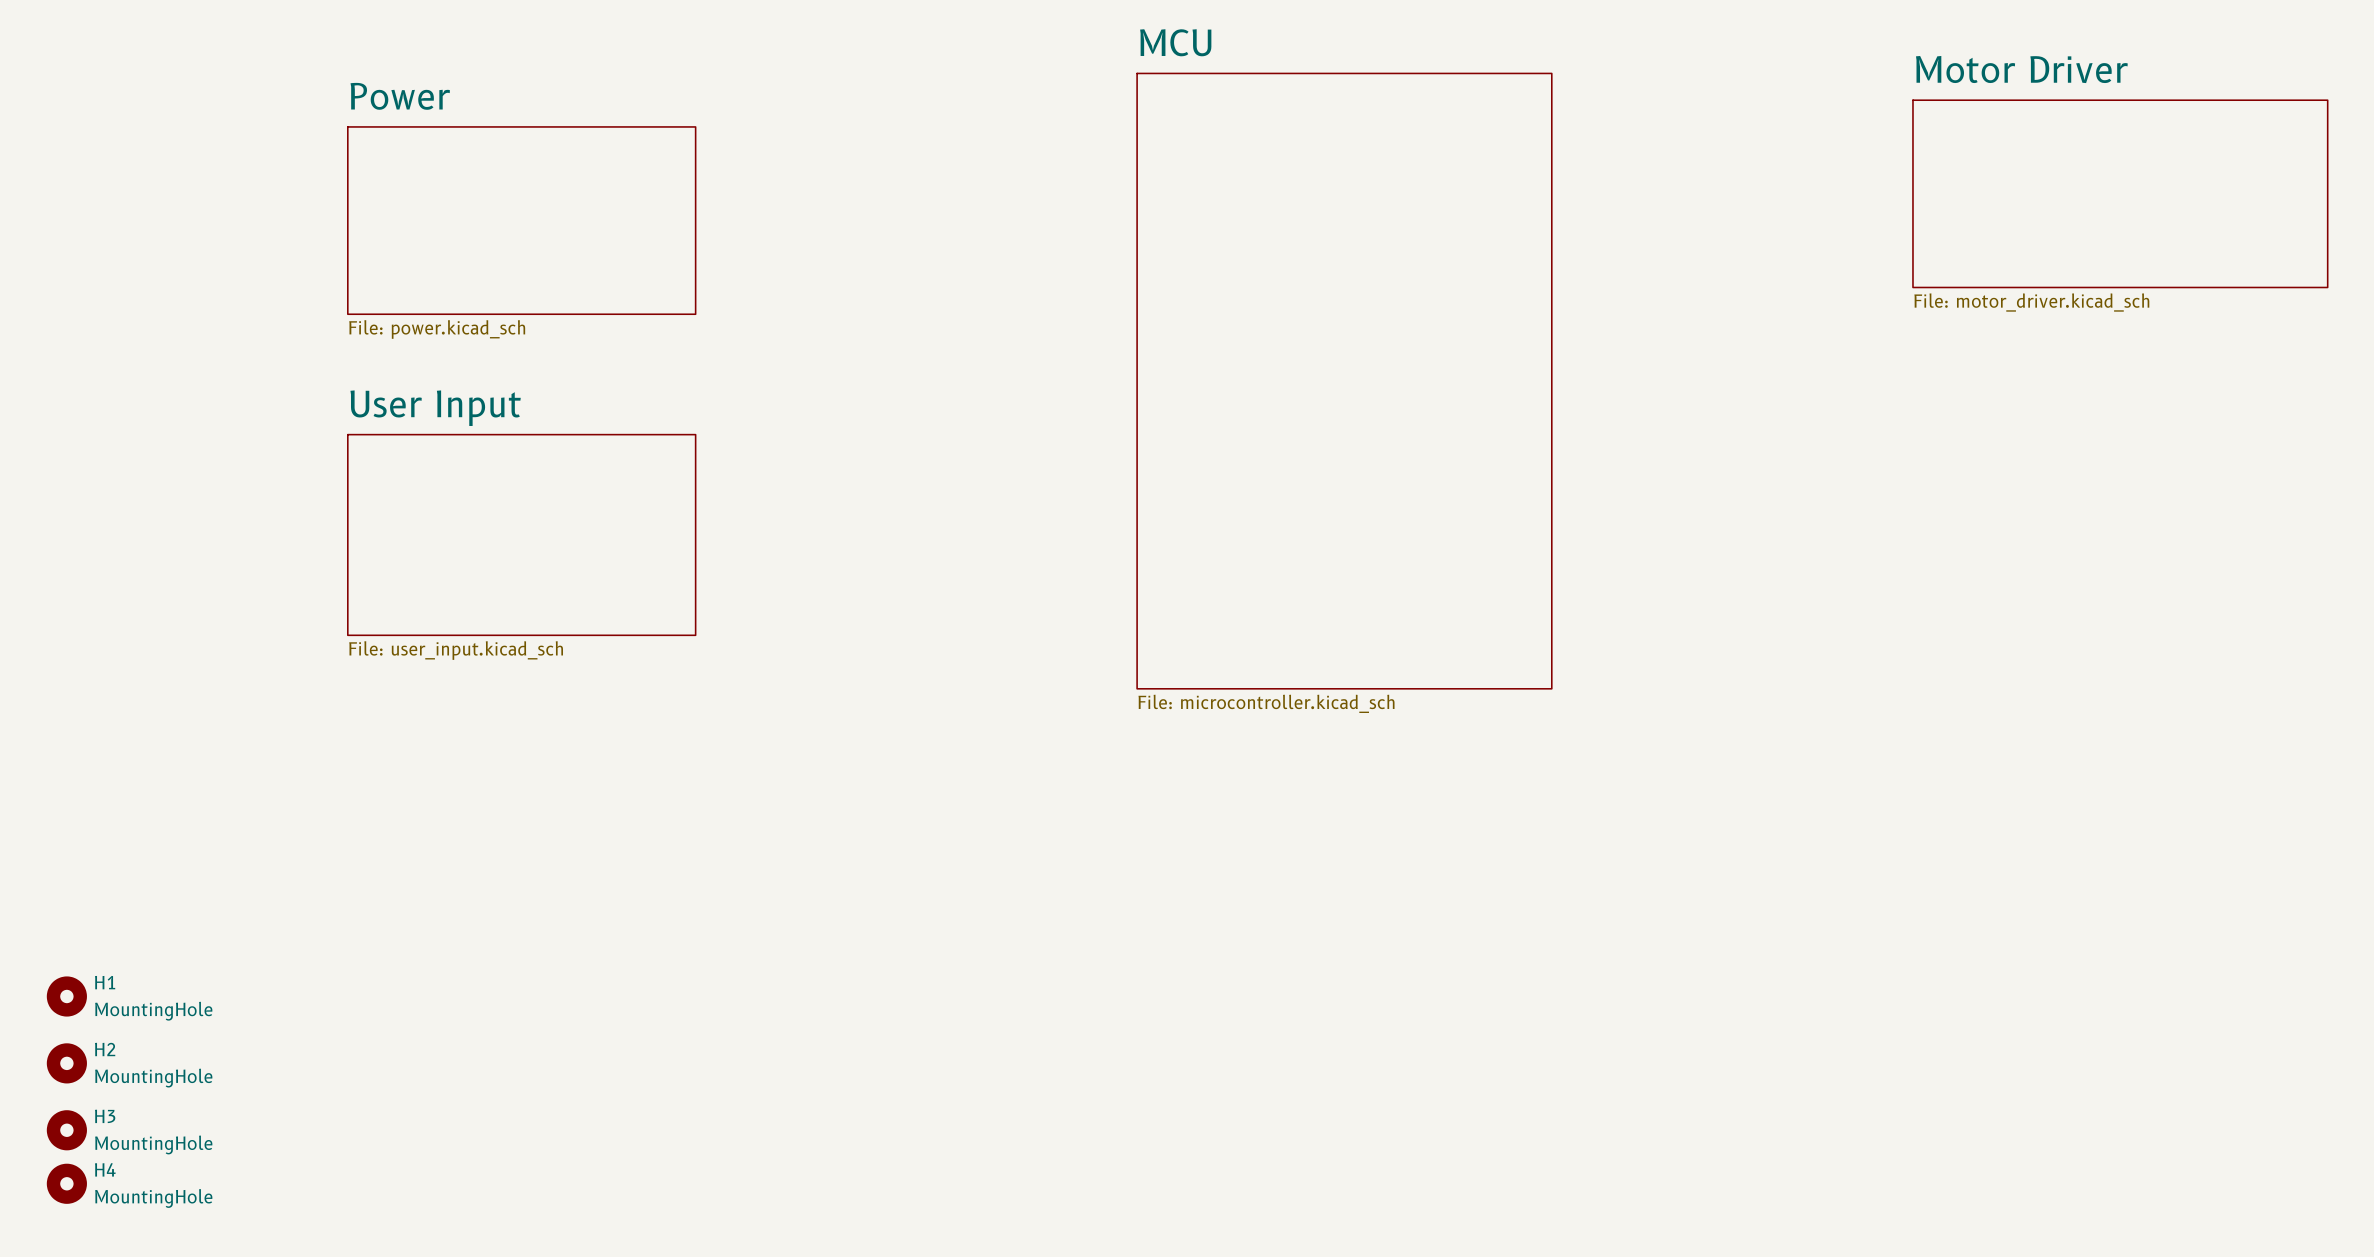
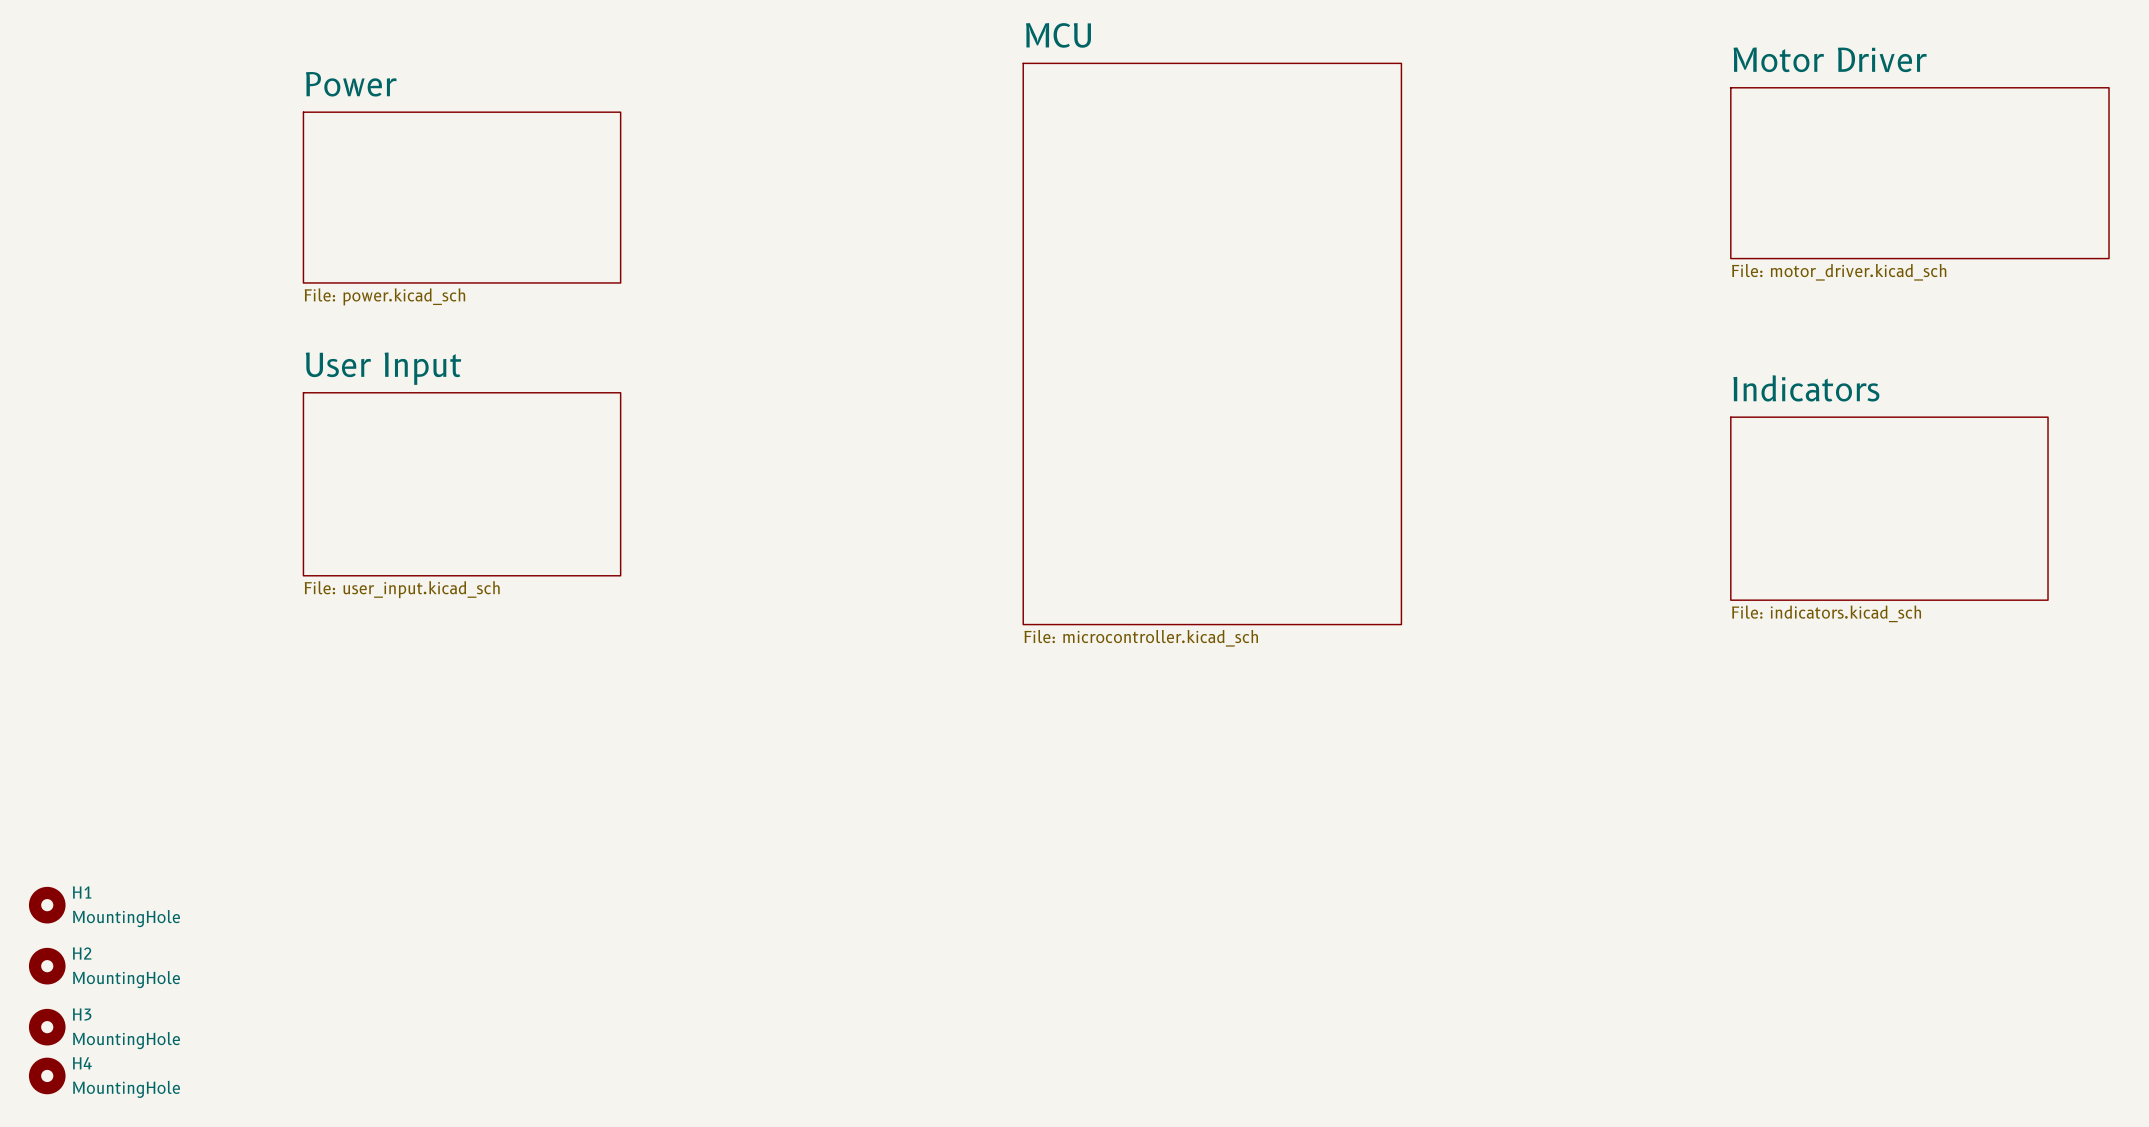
sheet Indicators: none -> File: indicators.kicad_sch (1889, 508)

